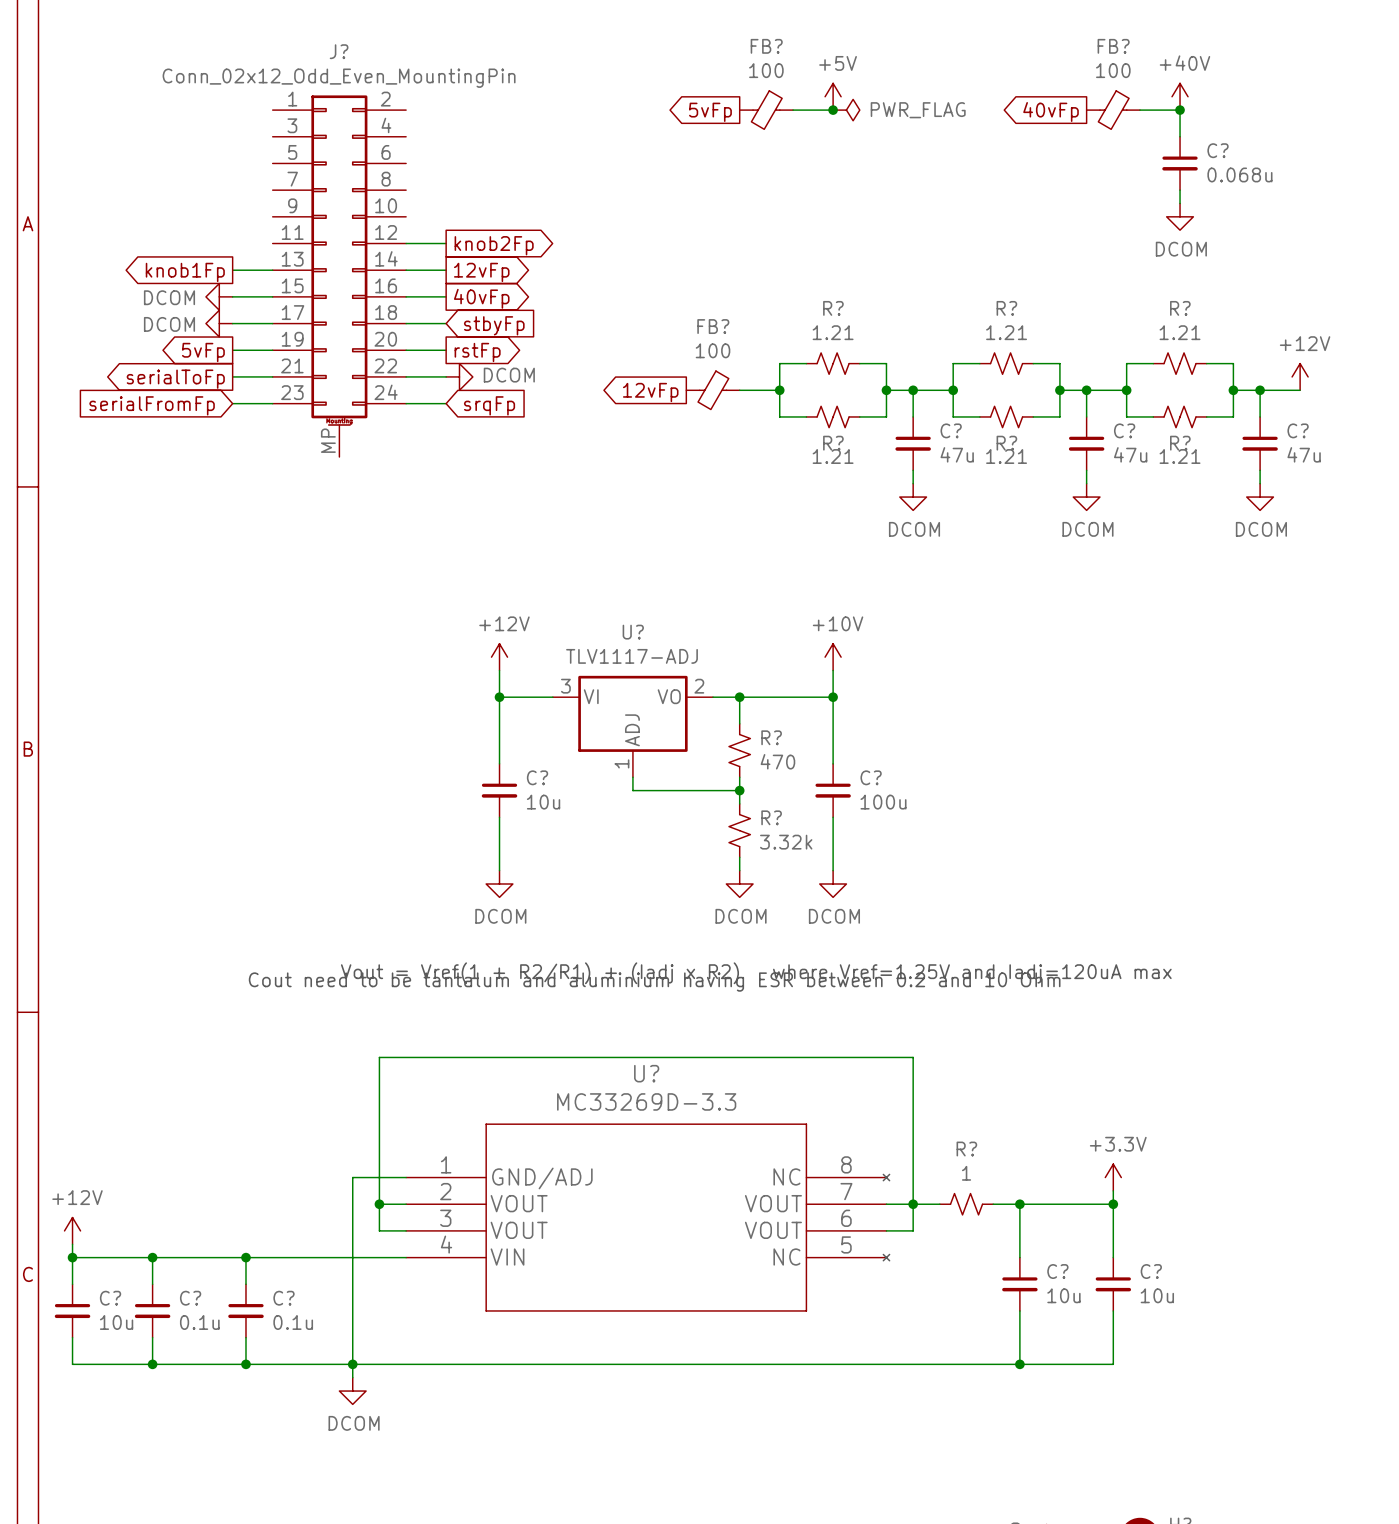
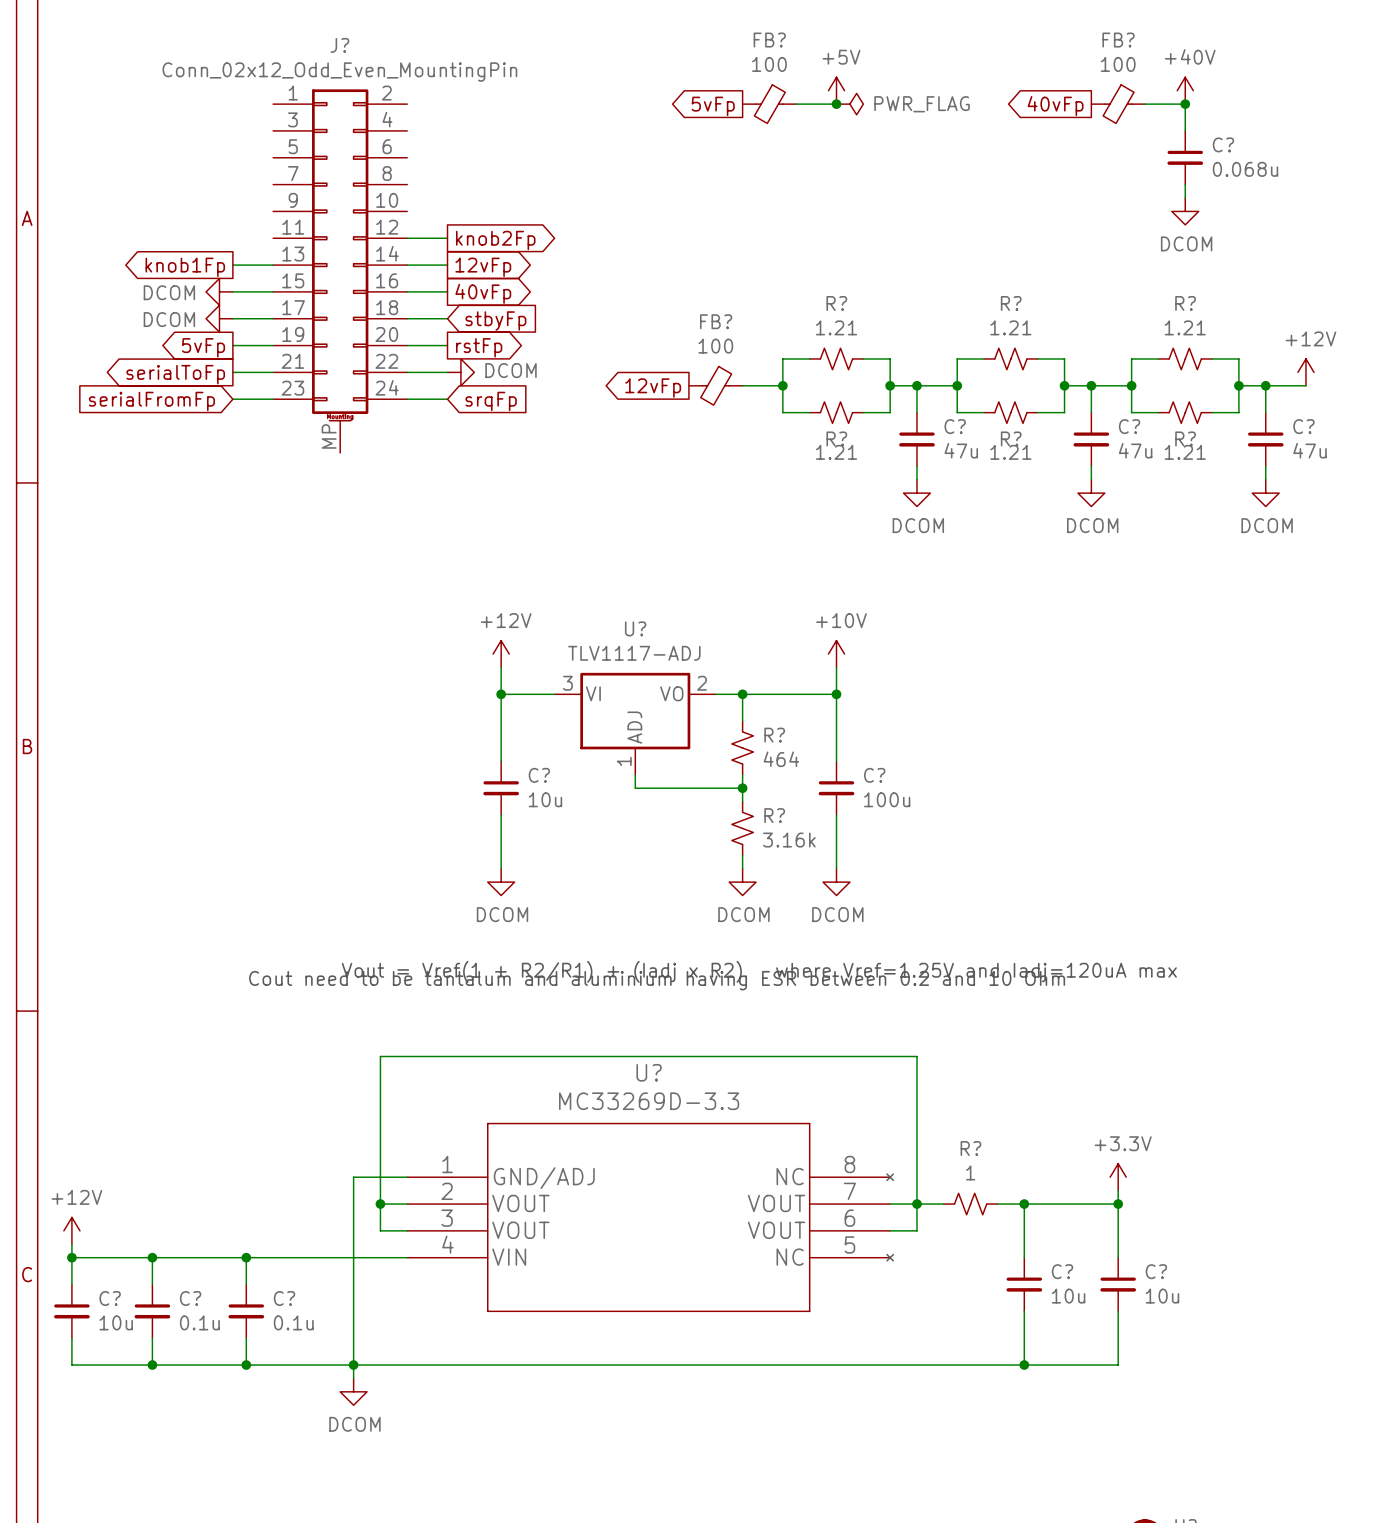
R? value: 470 (777, 761) -> 464 (781, 759)
R? value: 3.32k (786, 842) -> 3.16k (789, 840)

